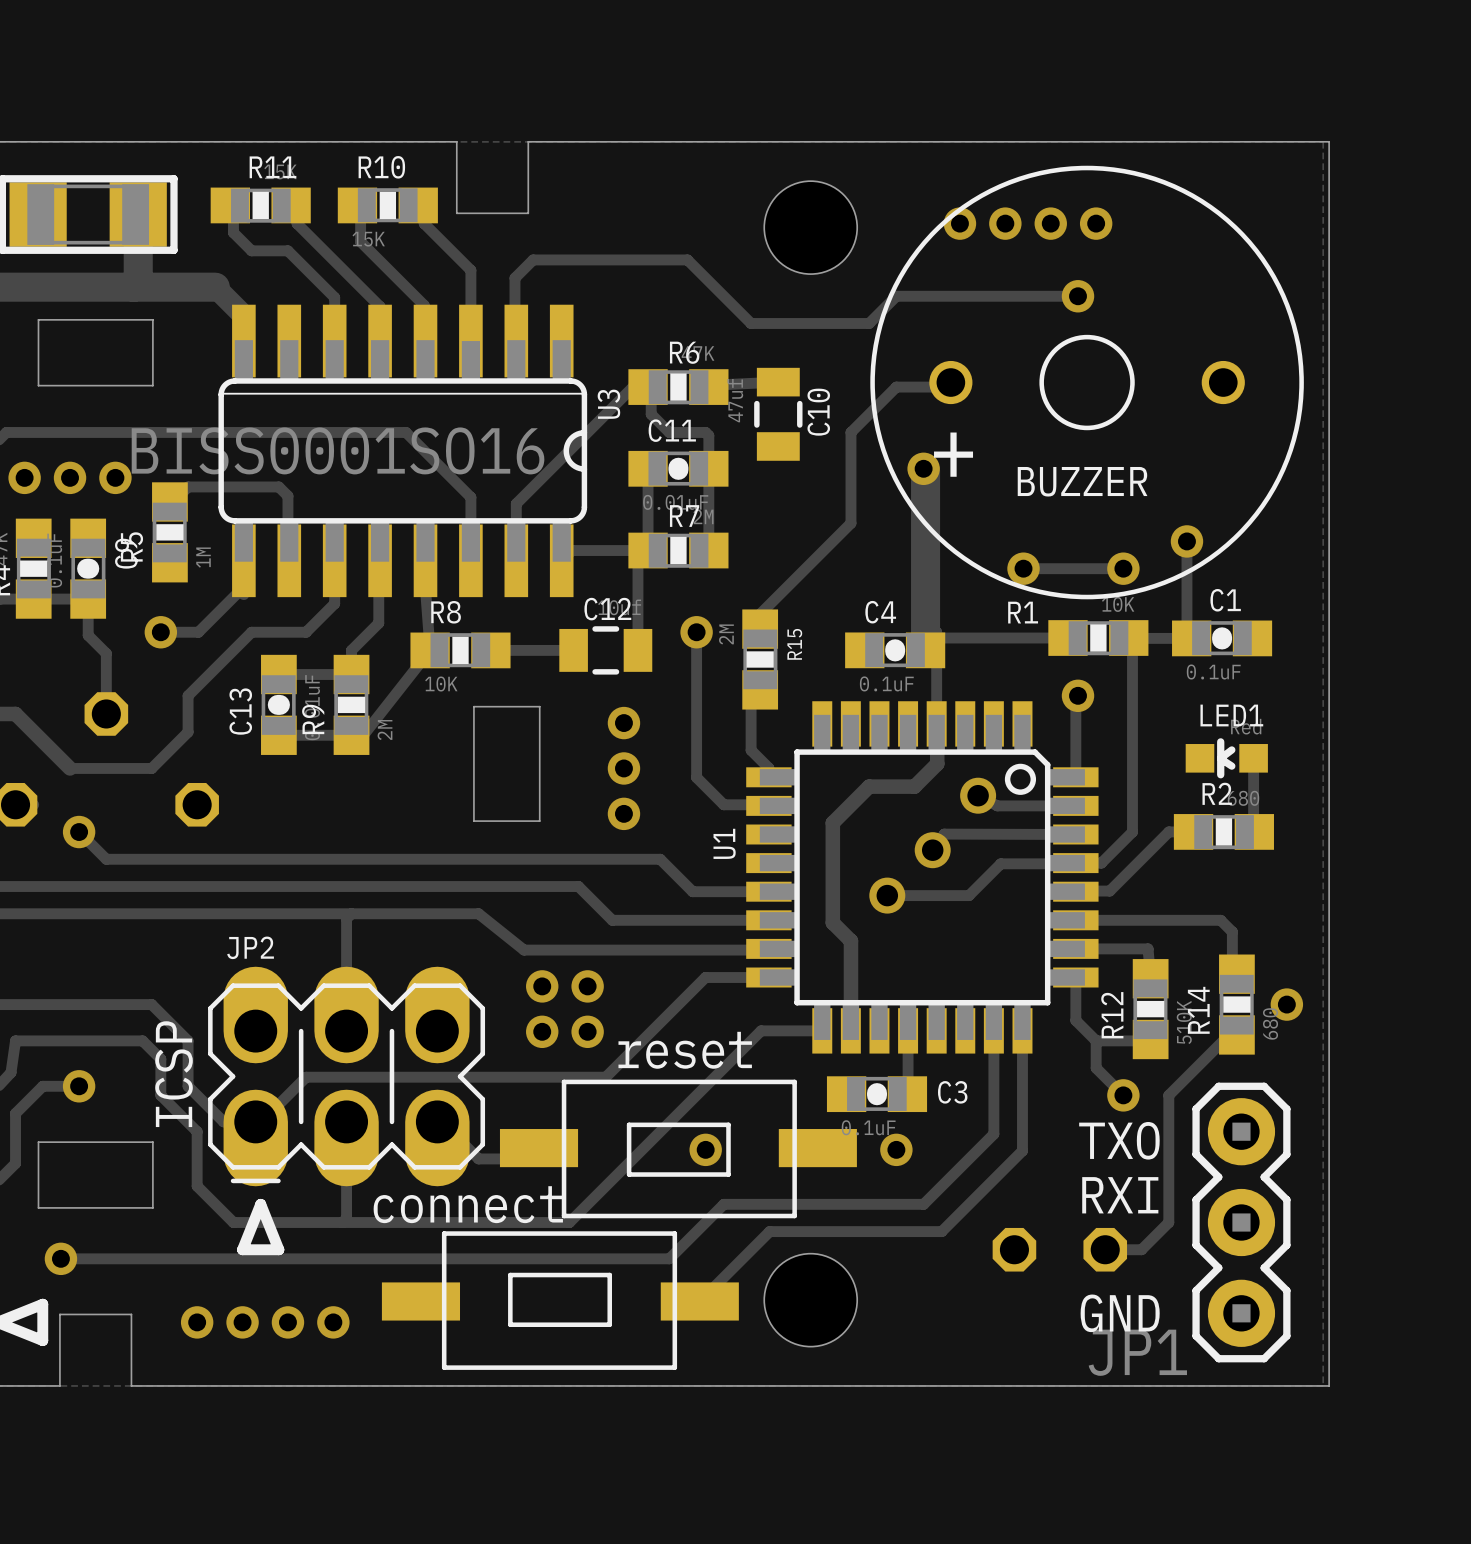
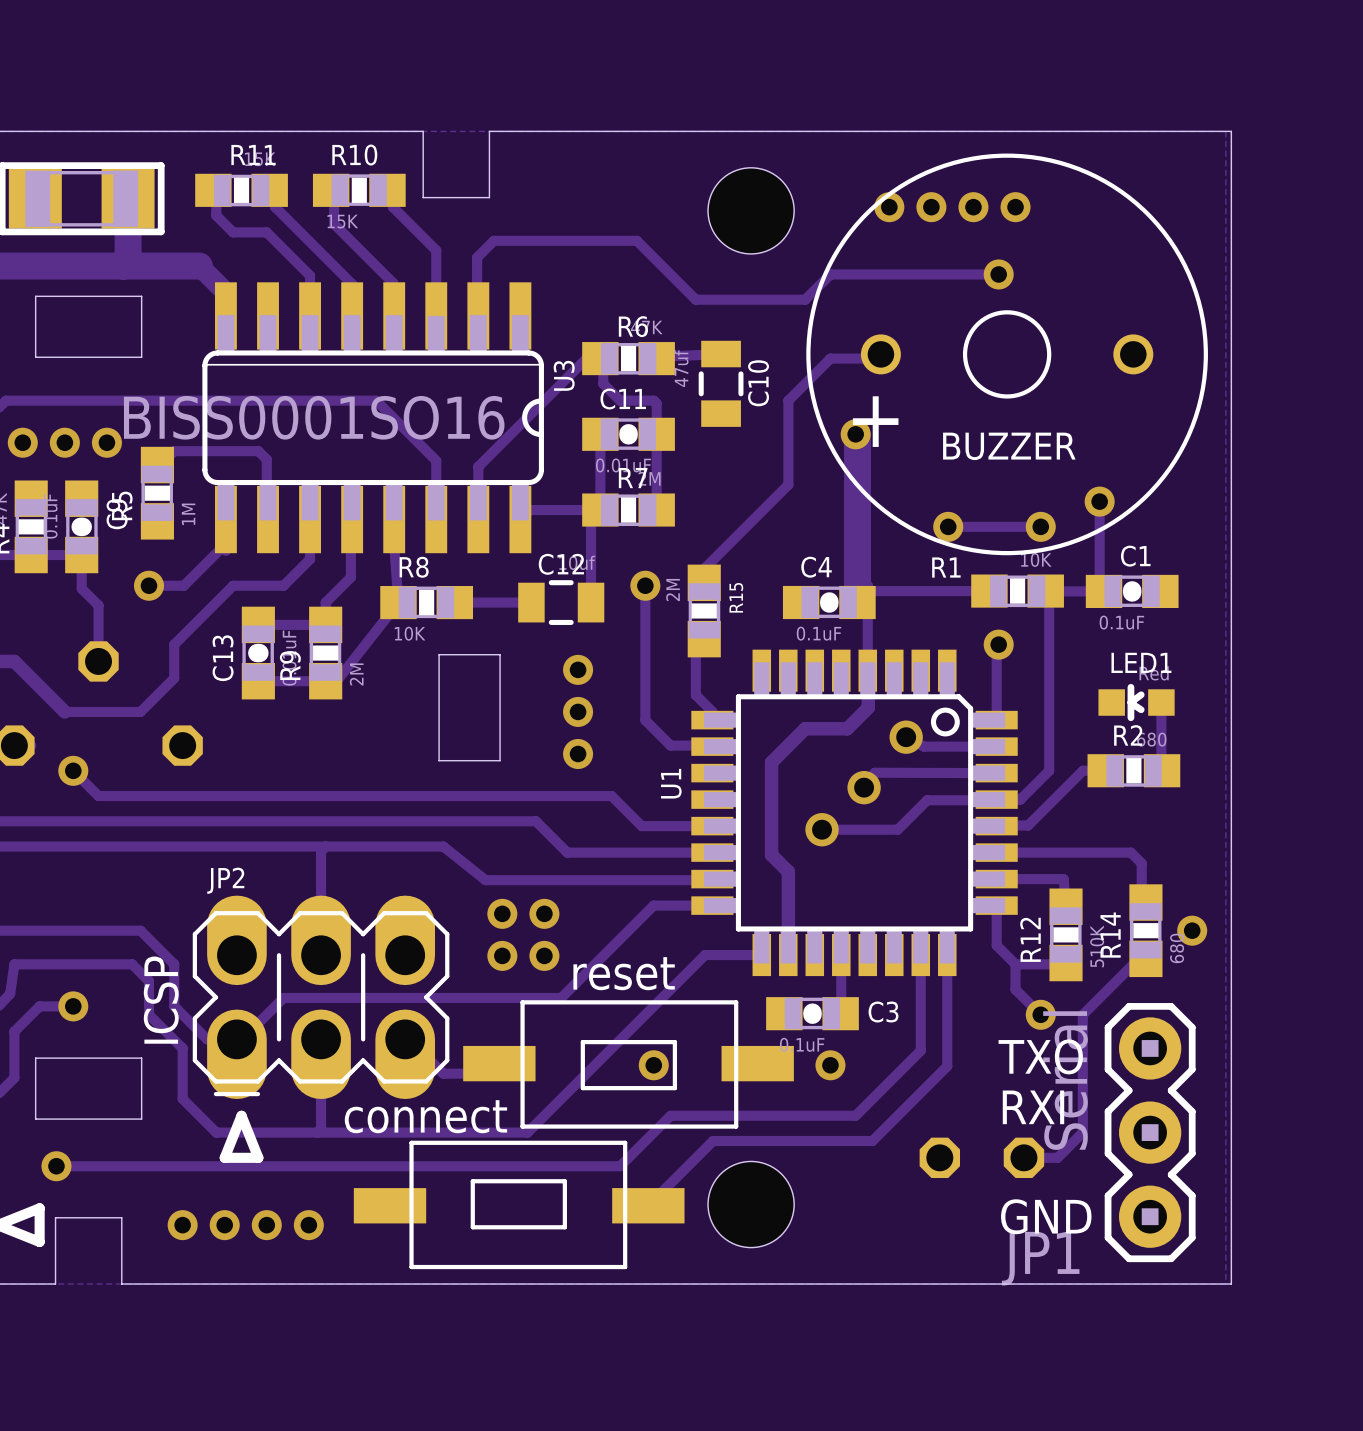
JP1 value: none -> Serial (1065, 1080)

